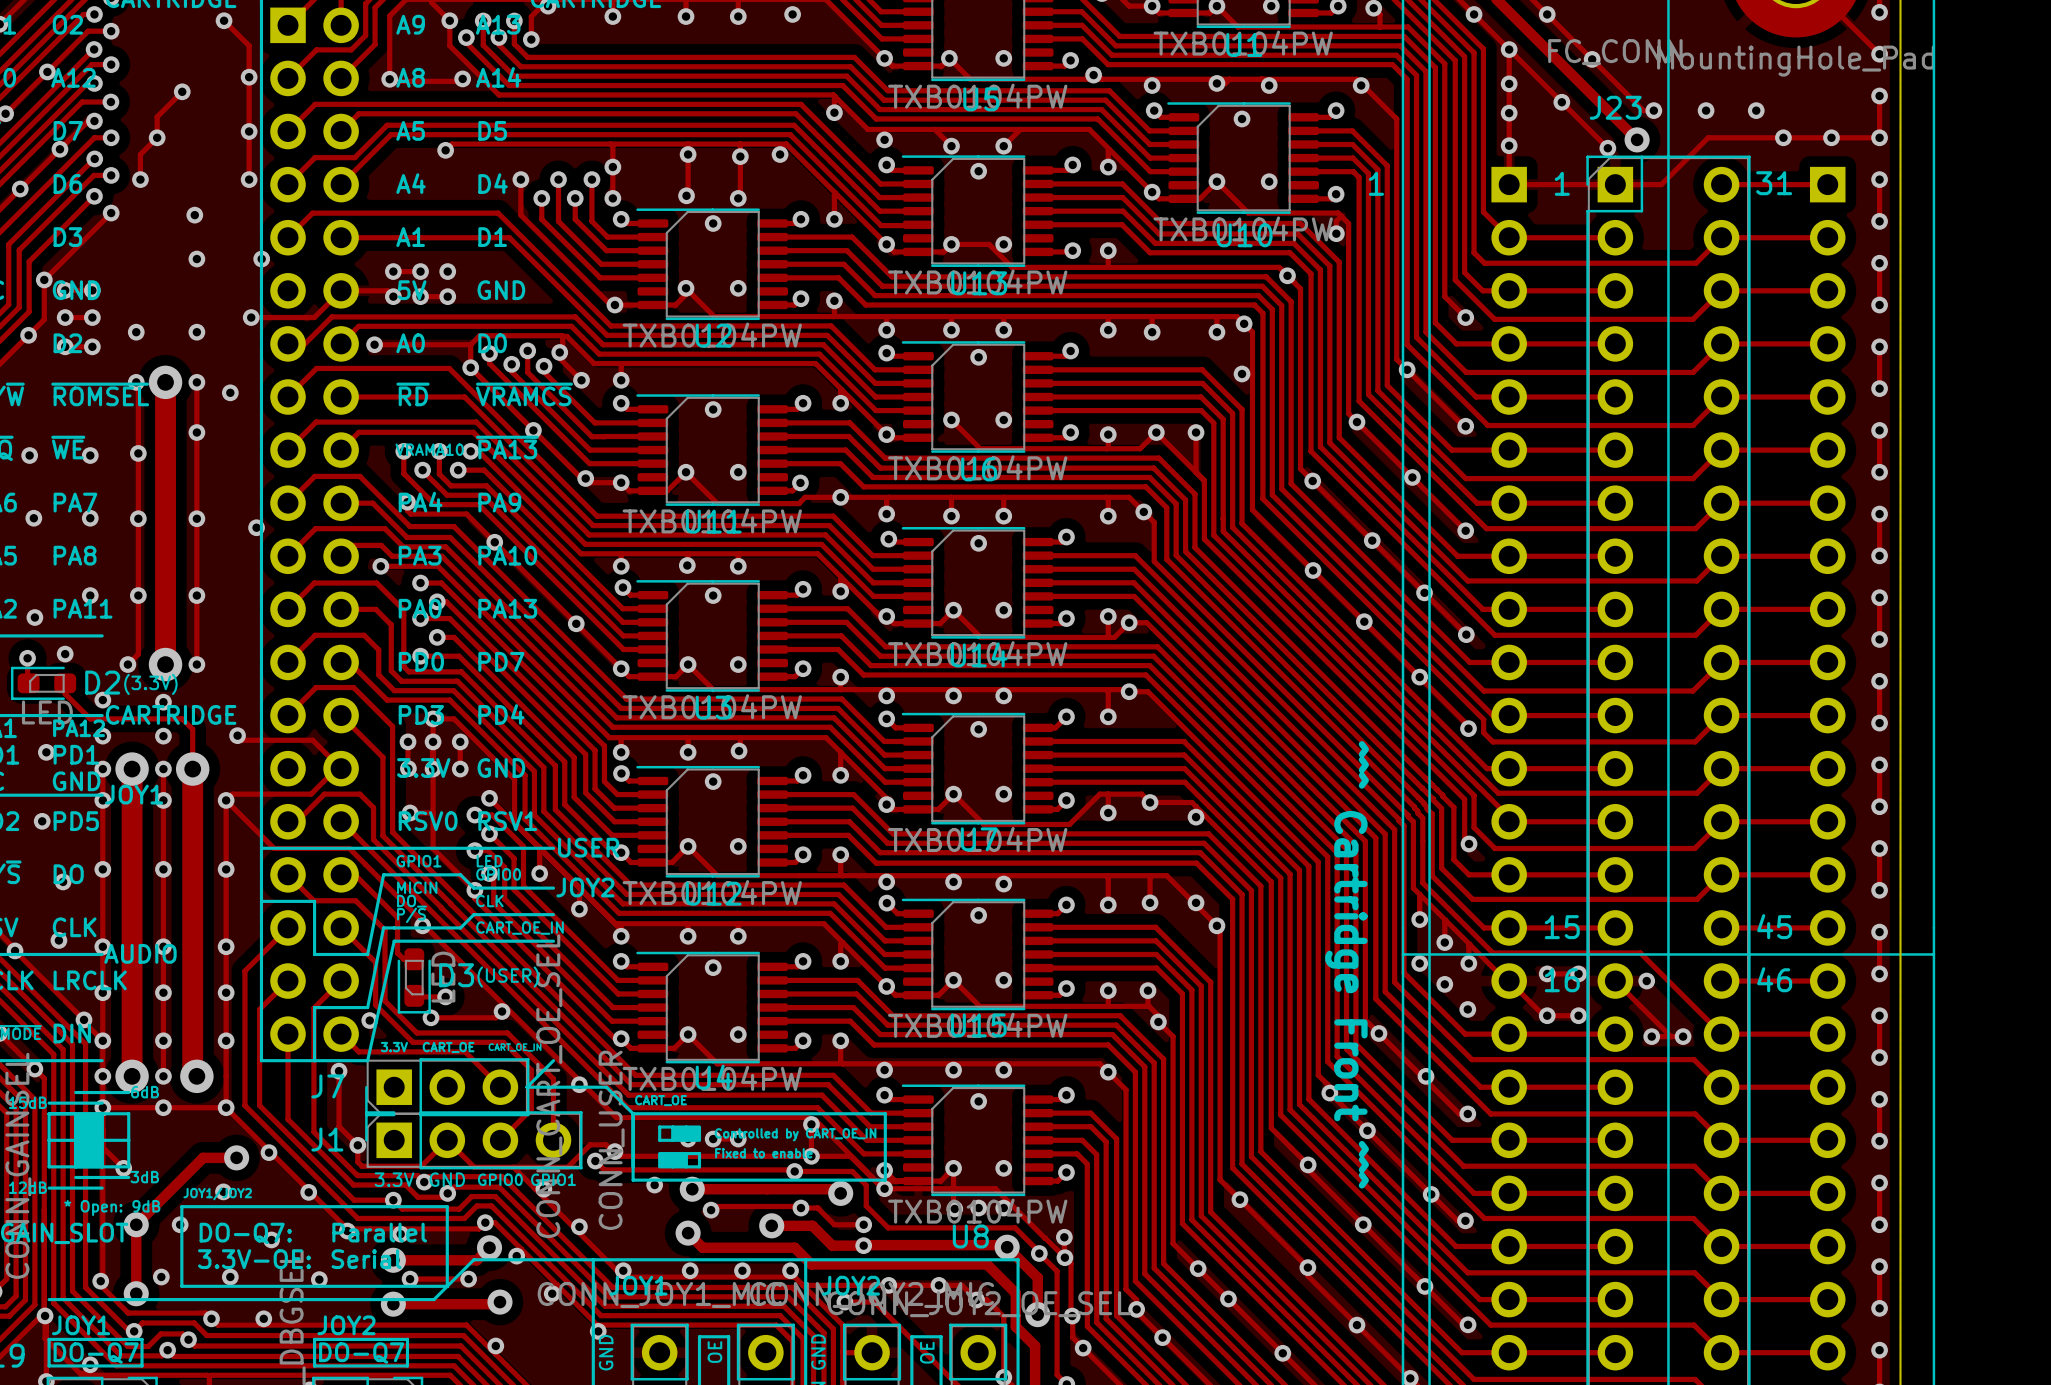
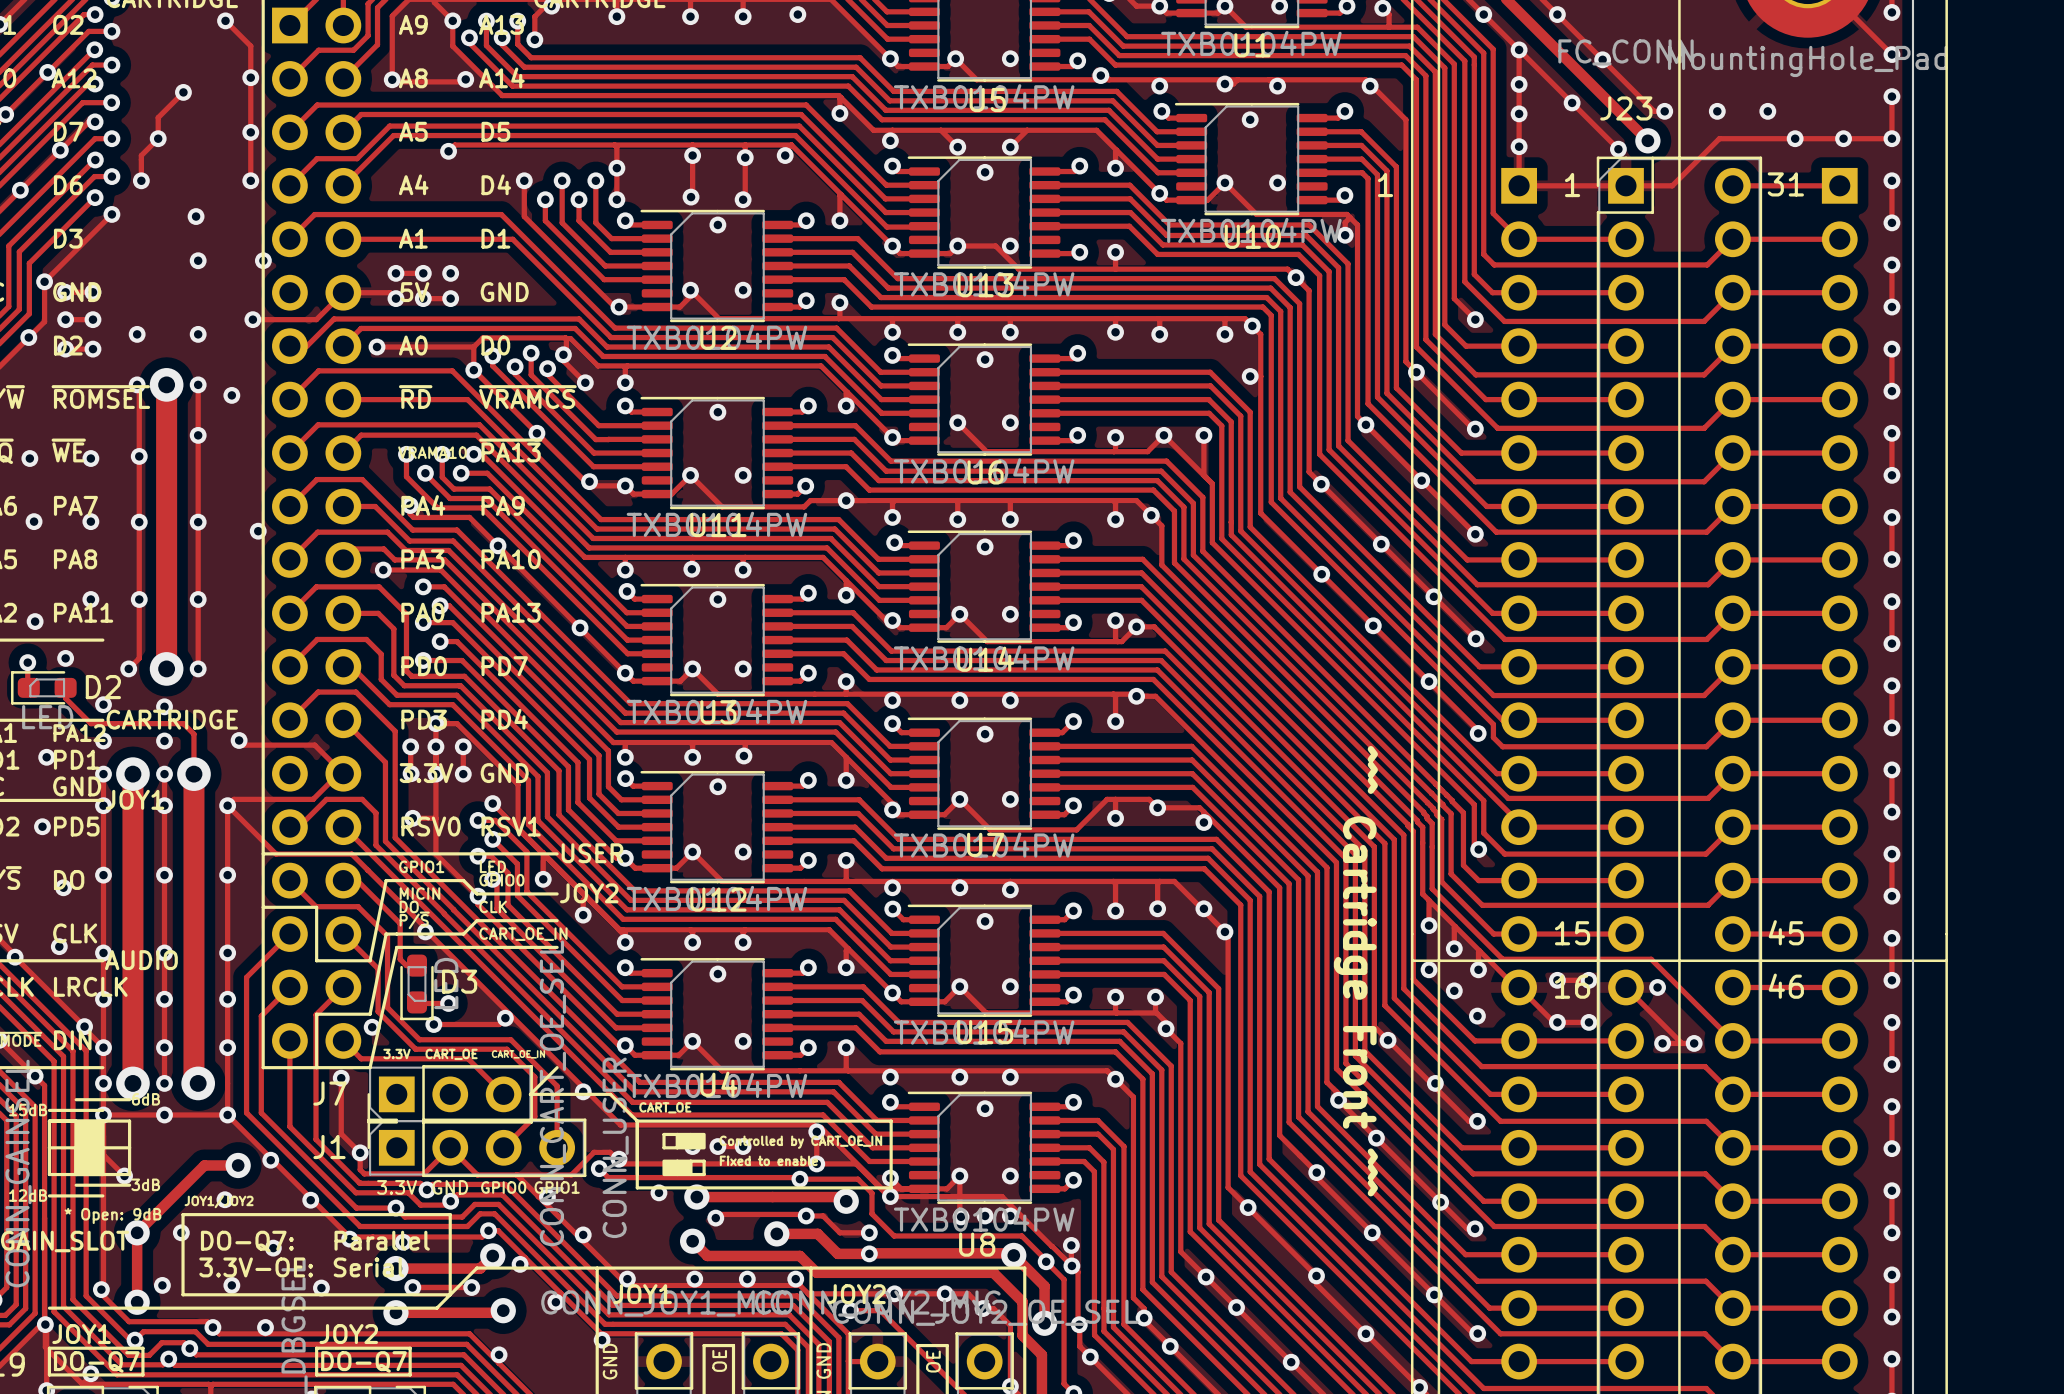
text: (3.3V) (150, 684) -> none
text: (USER) (508, 977) -> none

